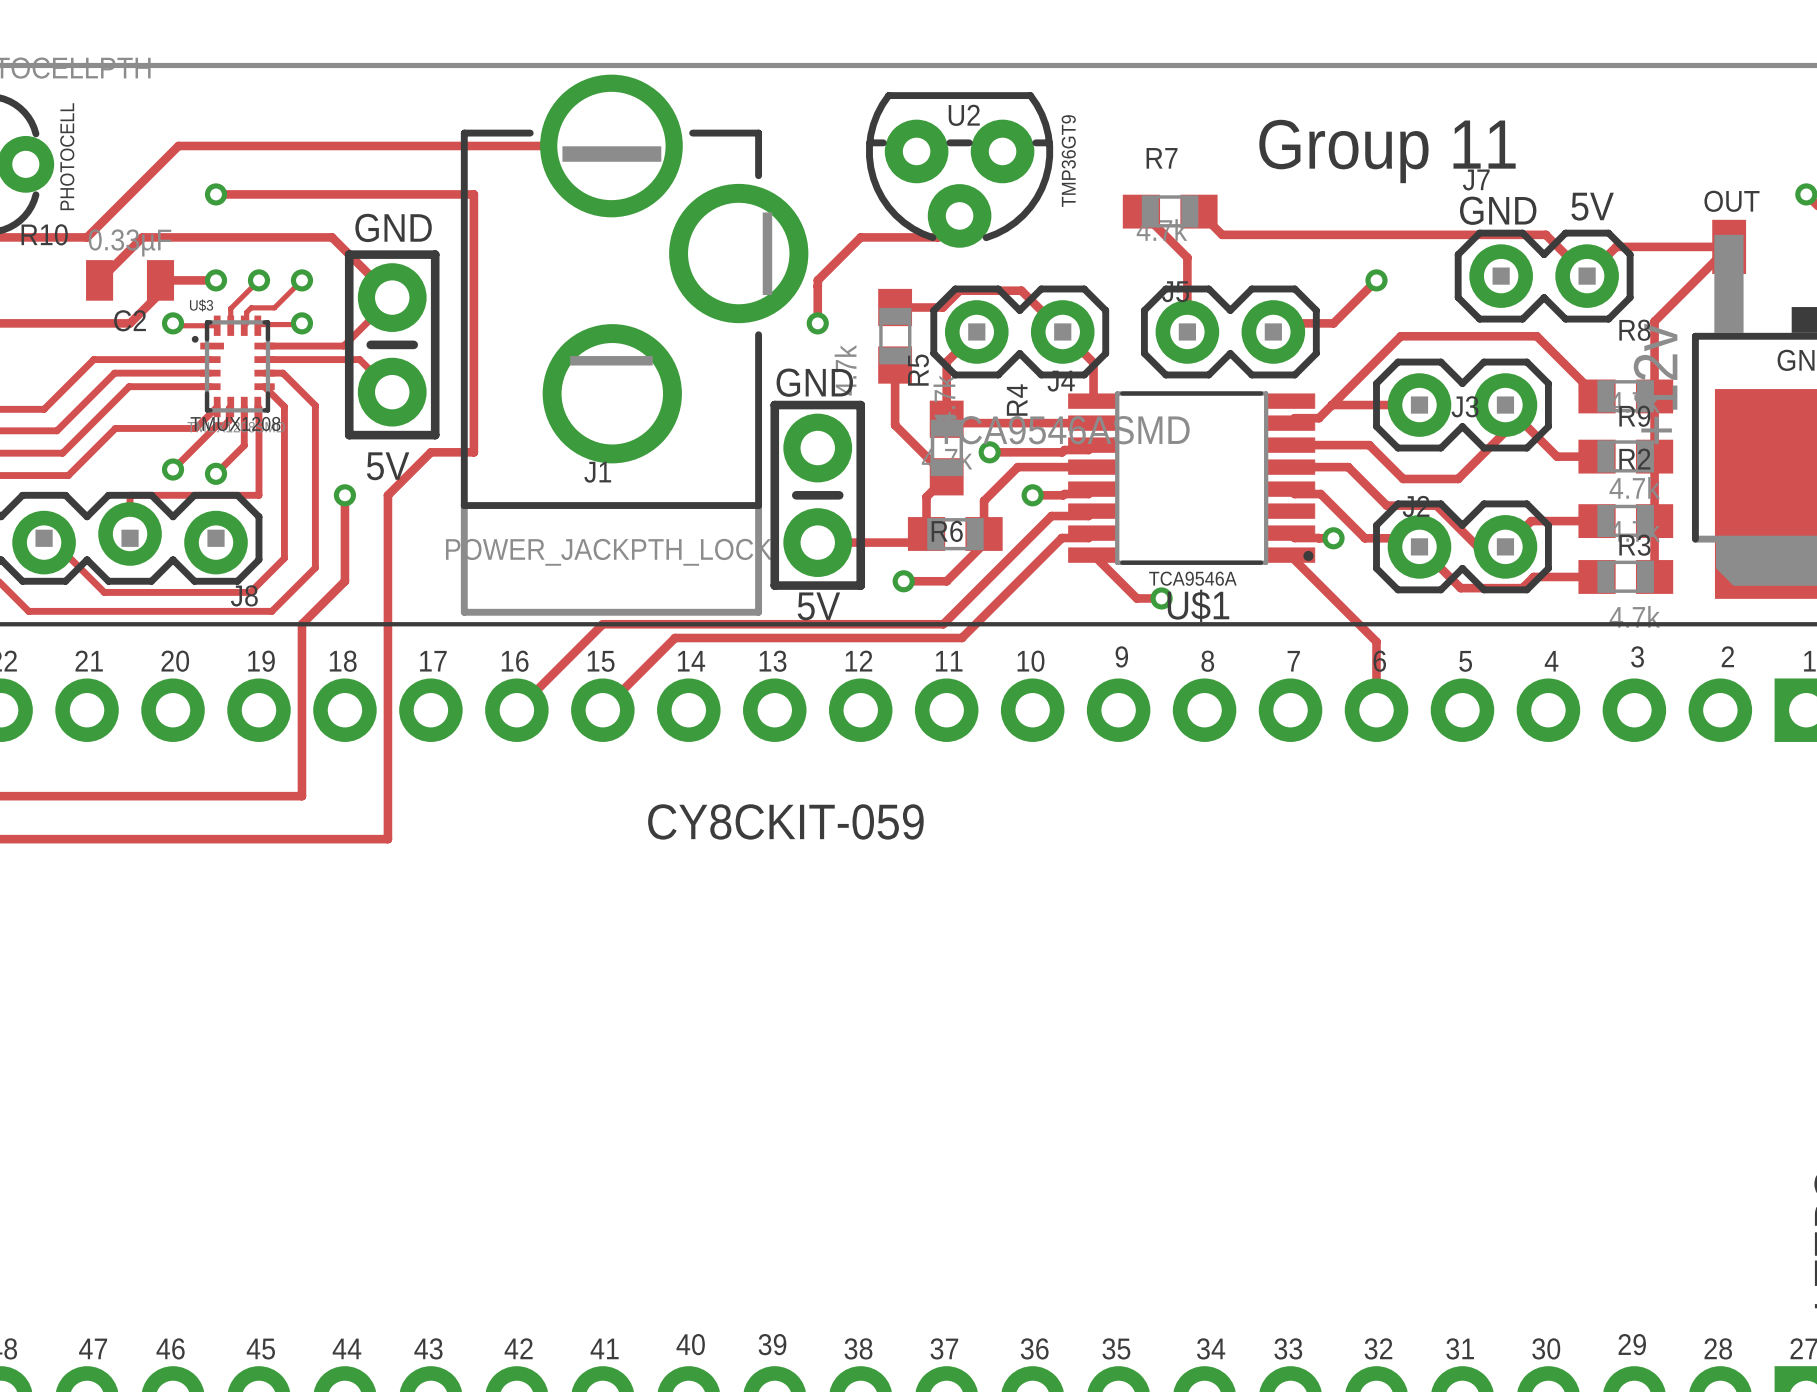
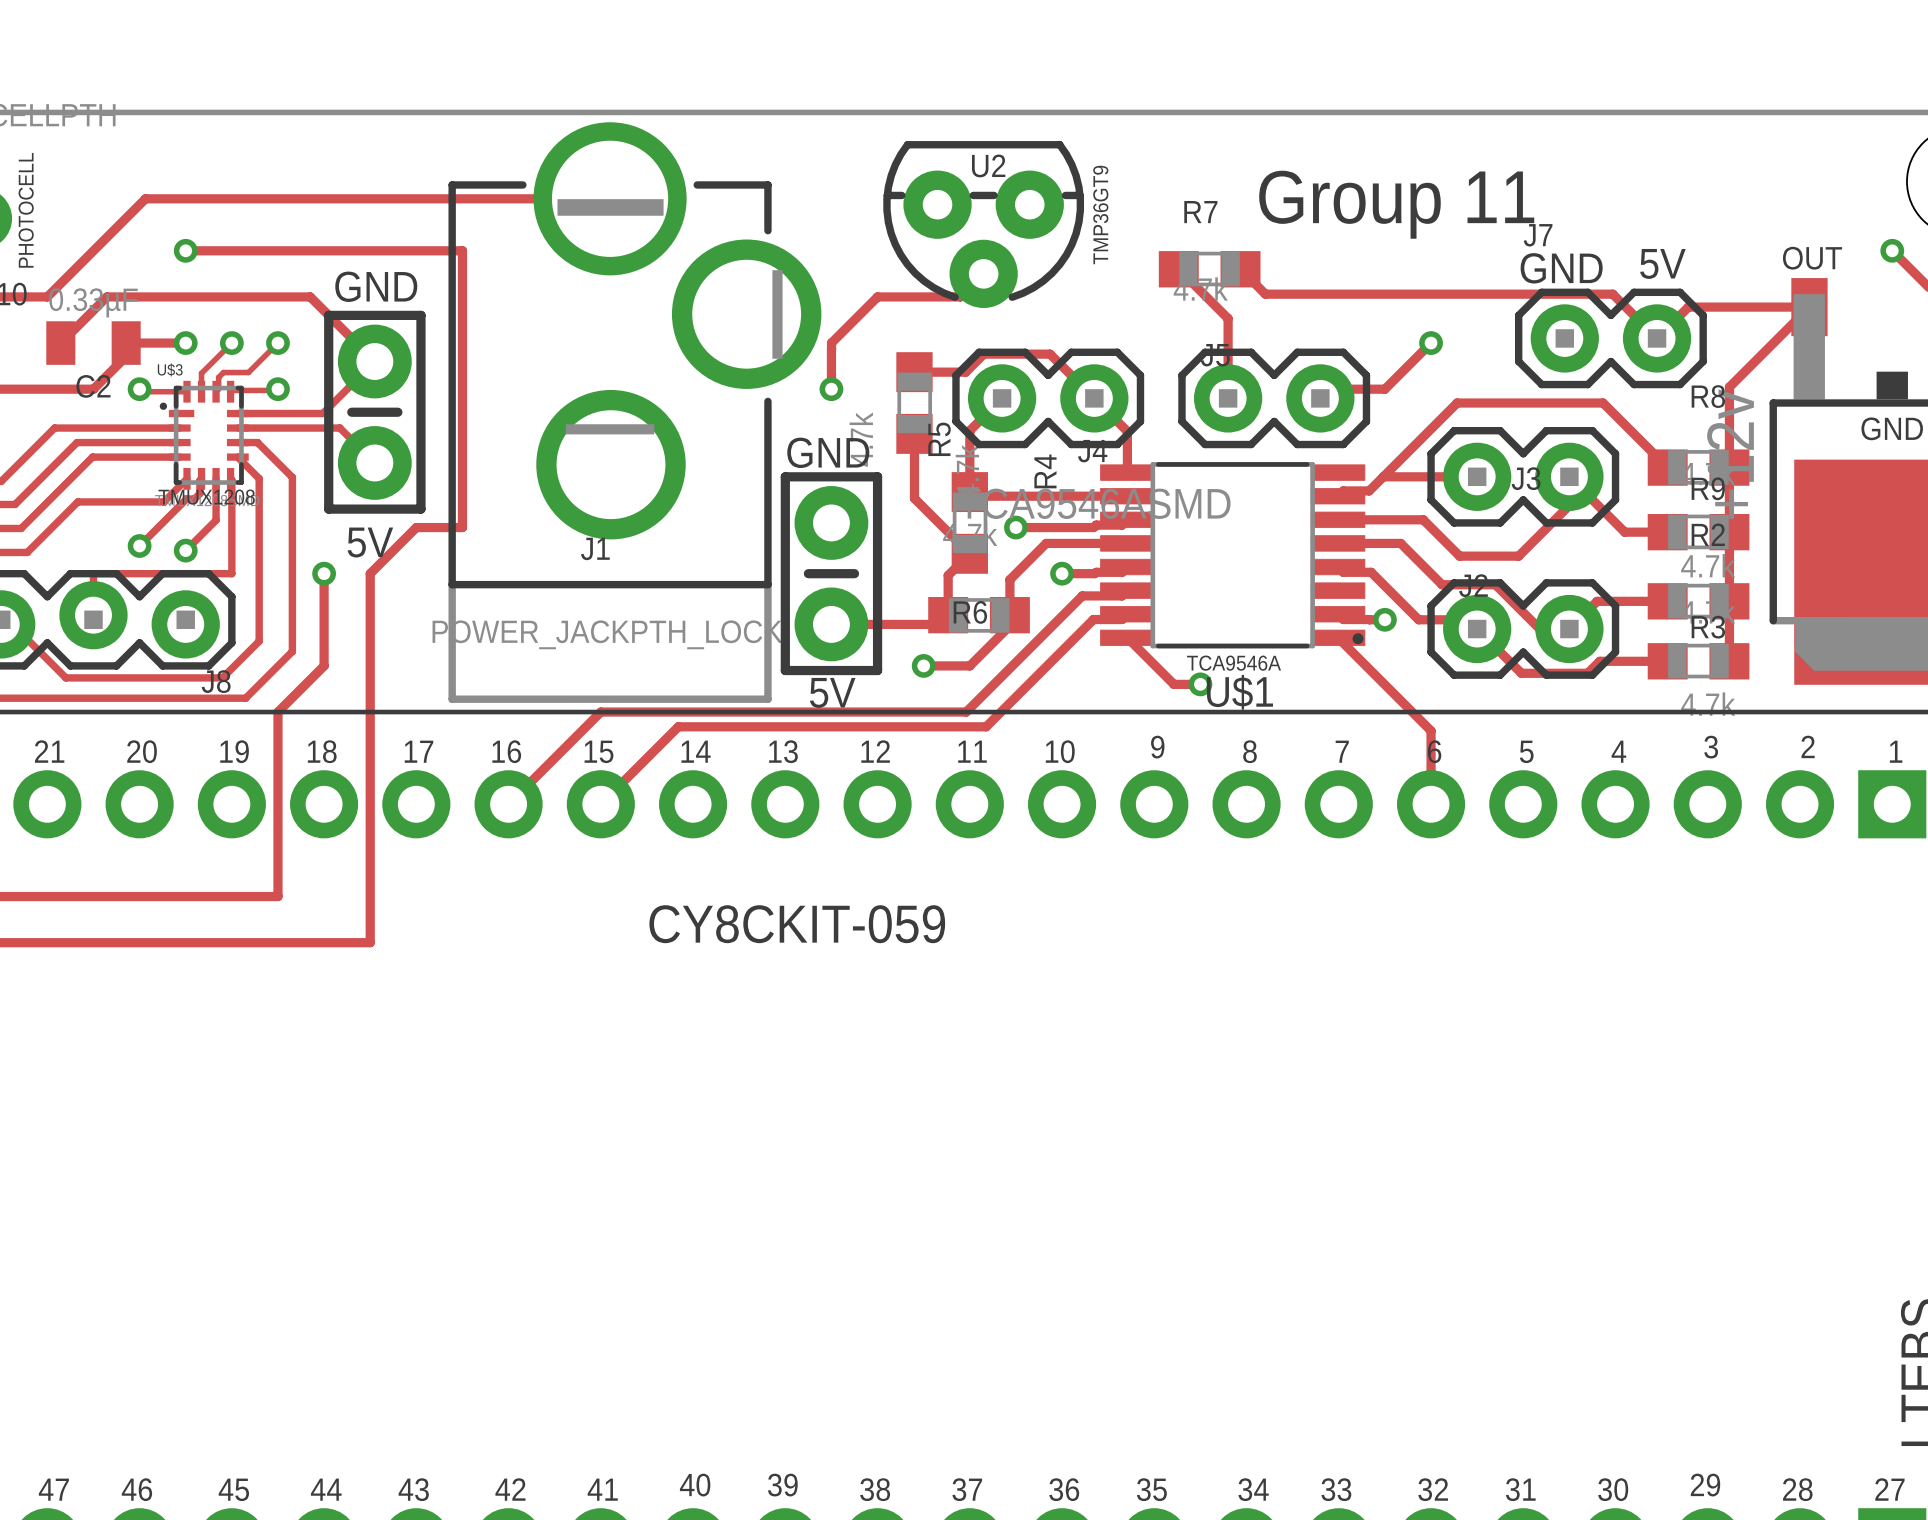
text position: Group 11 (1387, 151) -> Group 11 (1396, 204)

